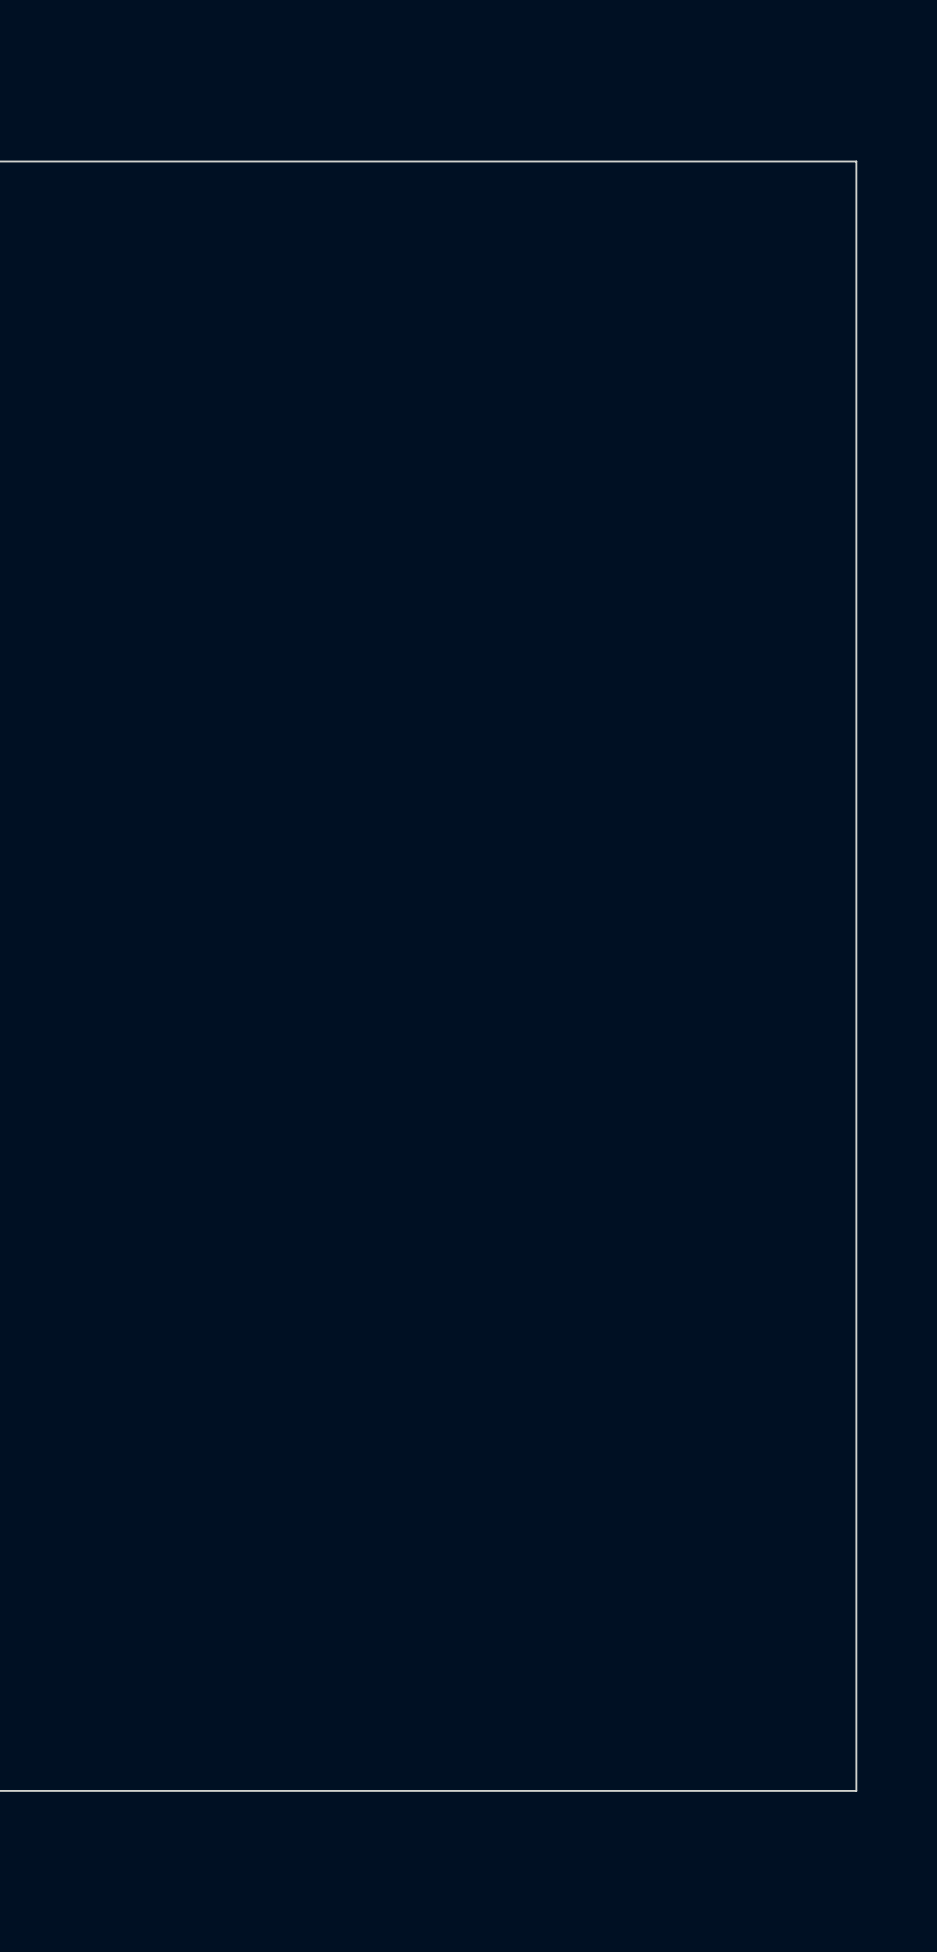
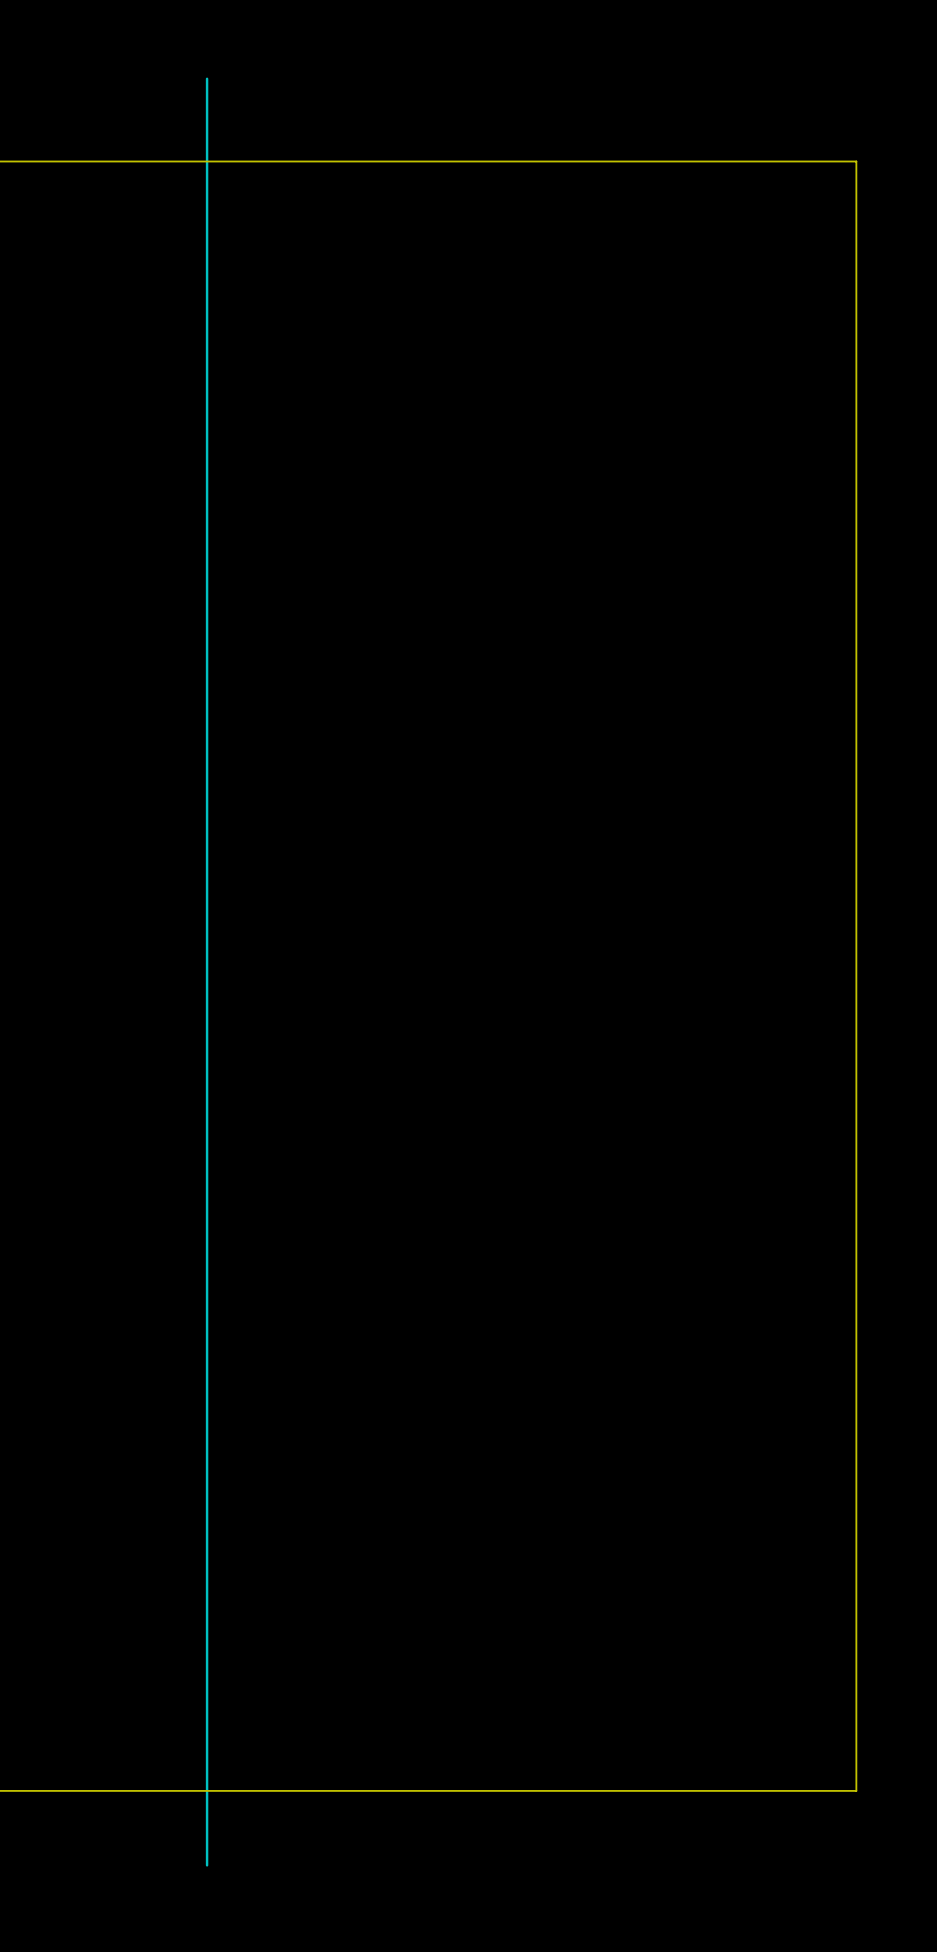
line: none -> (207, 78) (207, 1865)

